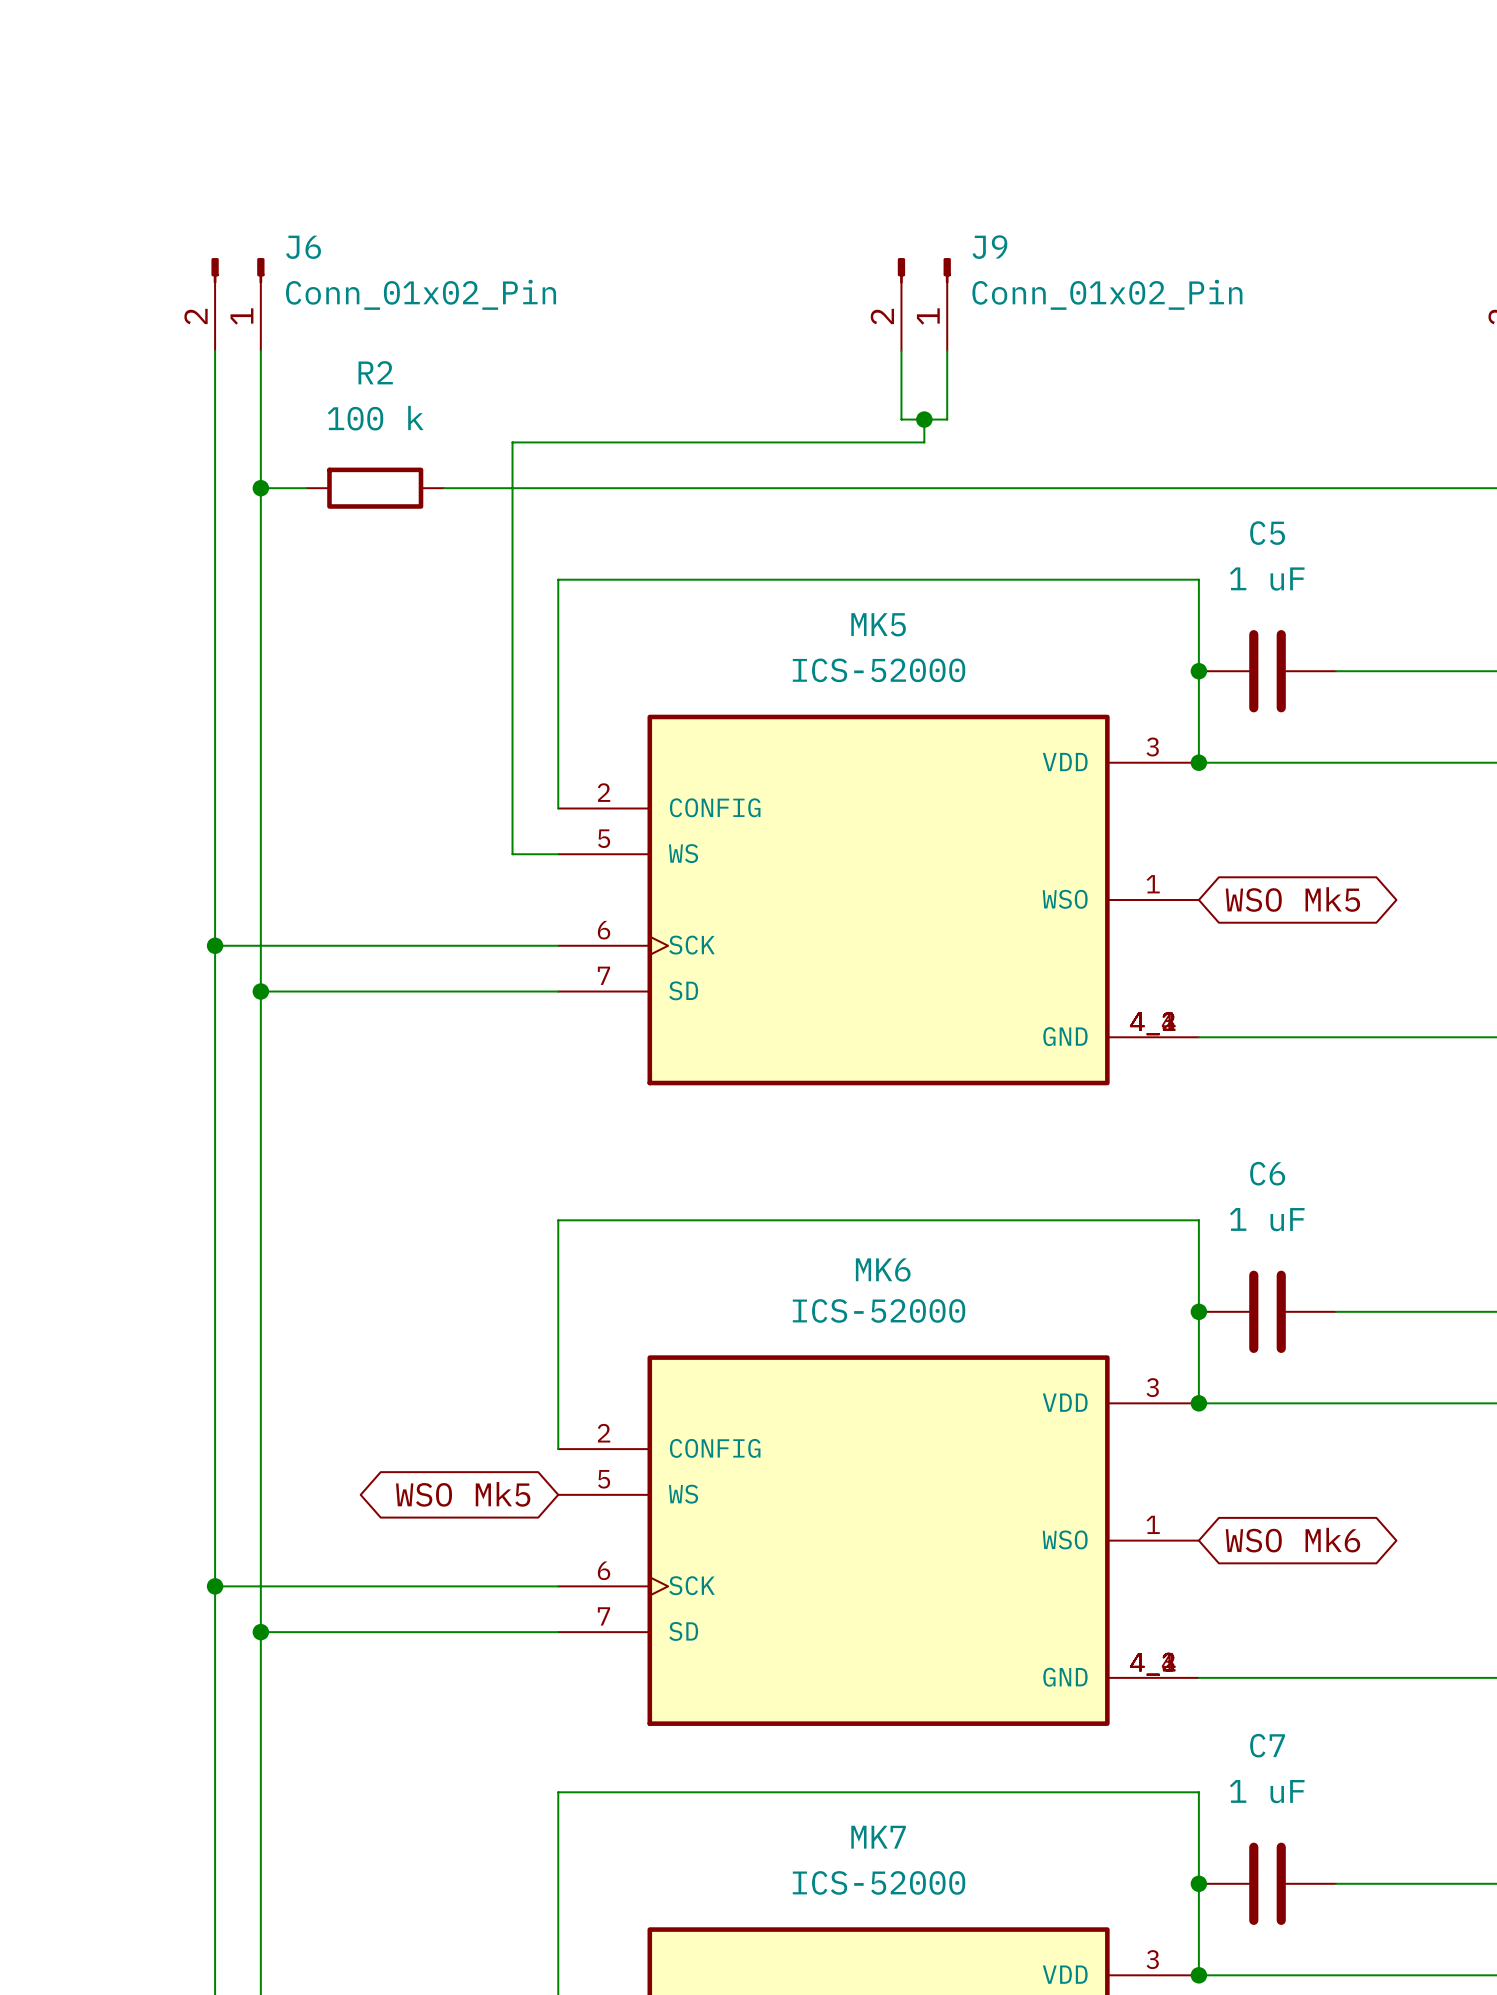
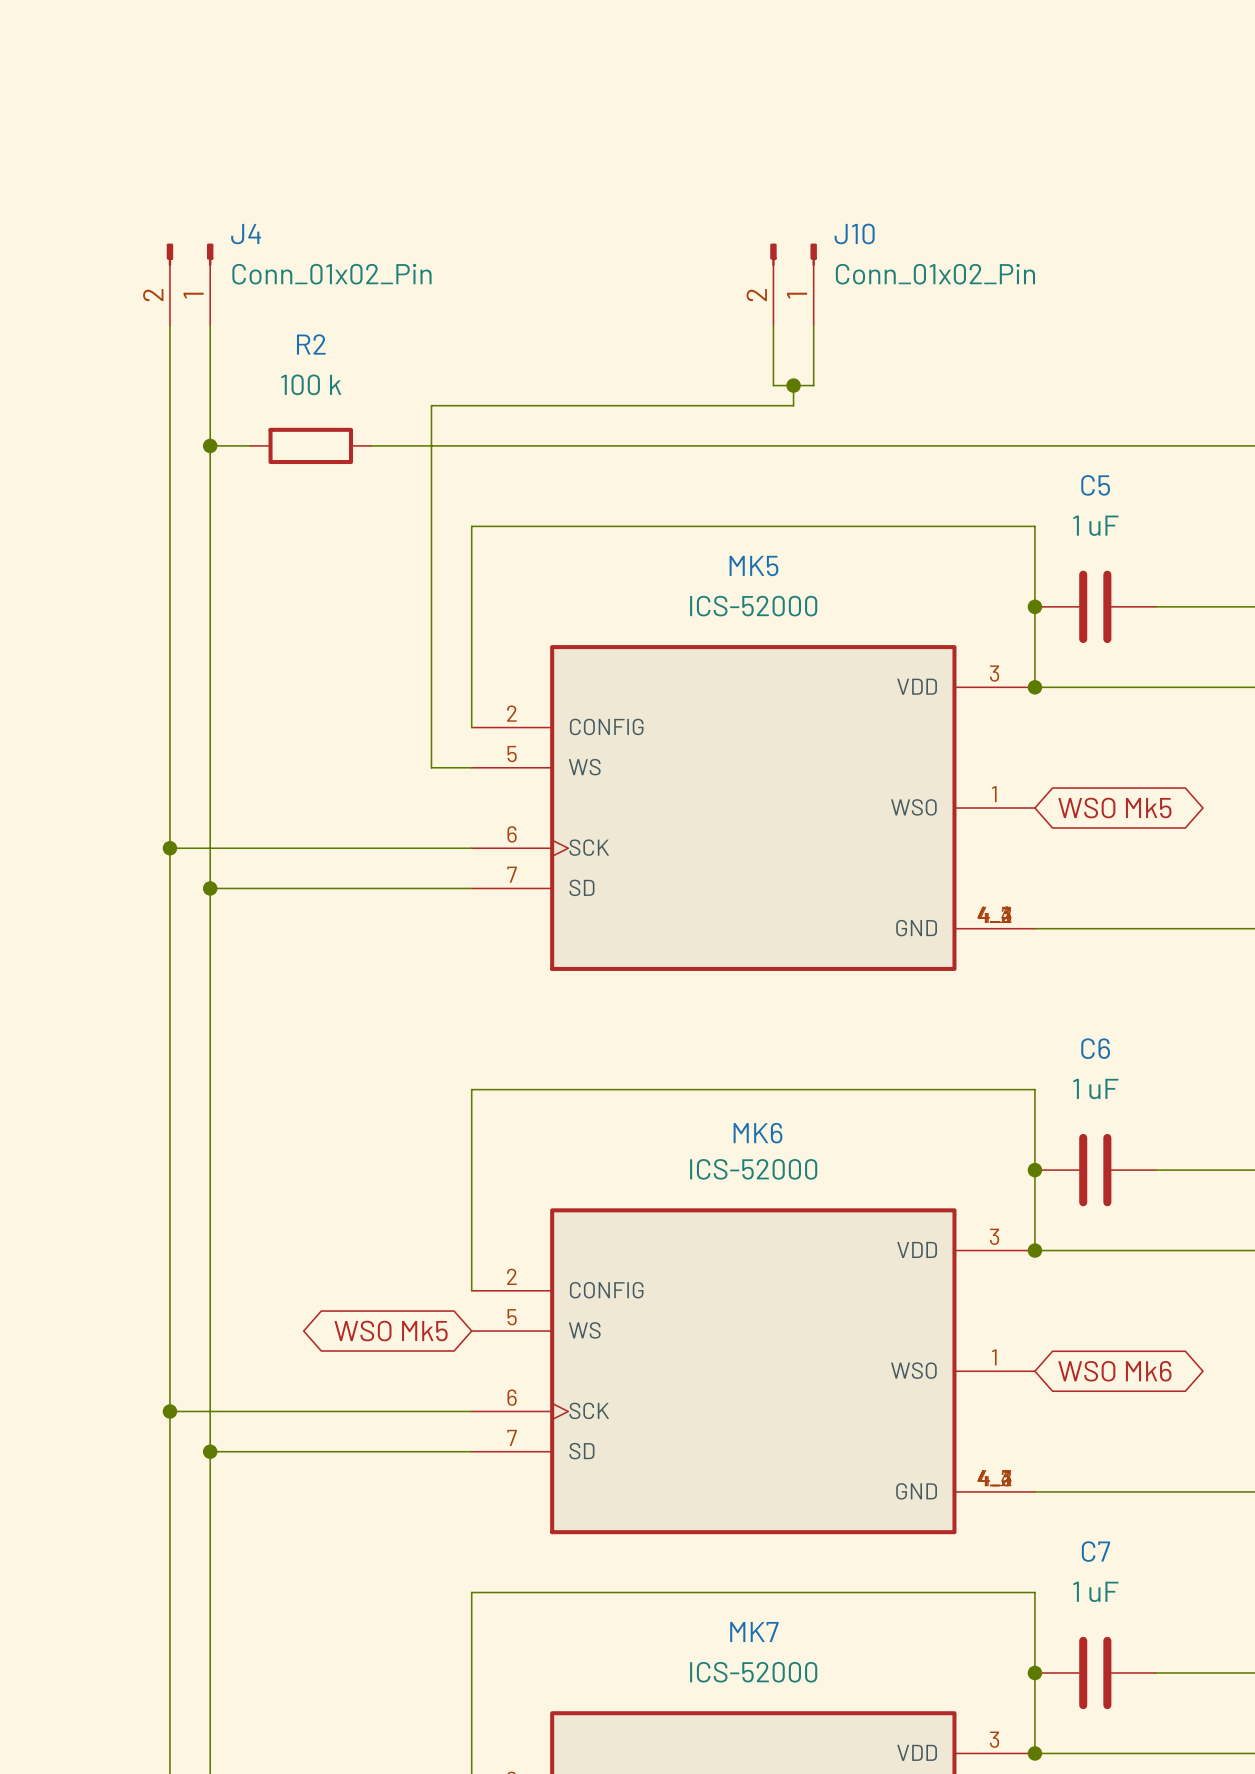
J6 name: J6 (303, 247) -> J4 (246, 234)
J9 name: J9 (989, 247) -> J10 (854, 233)

